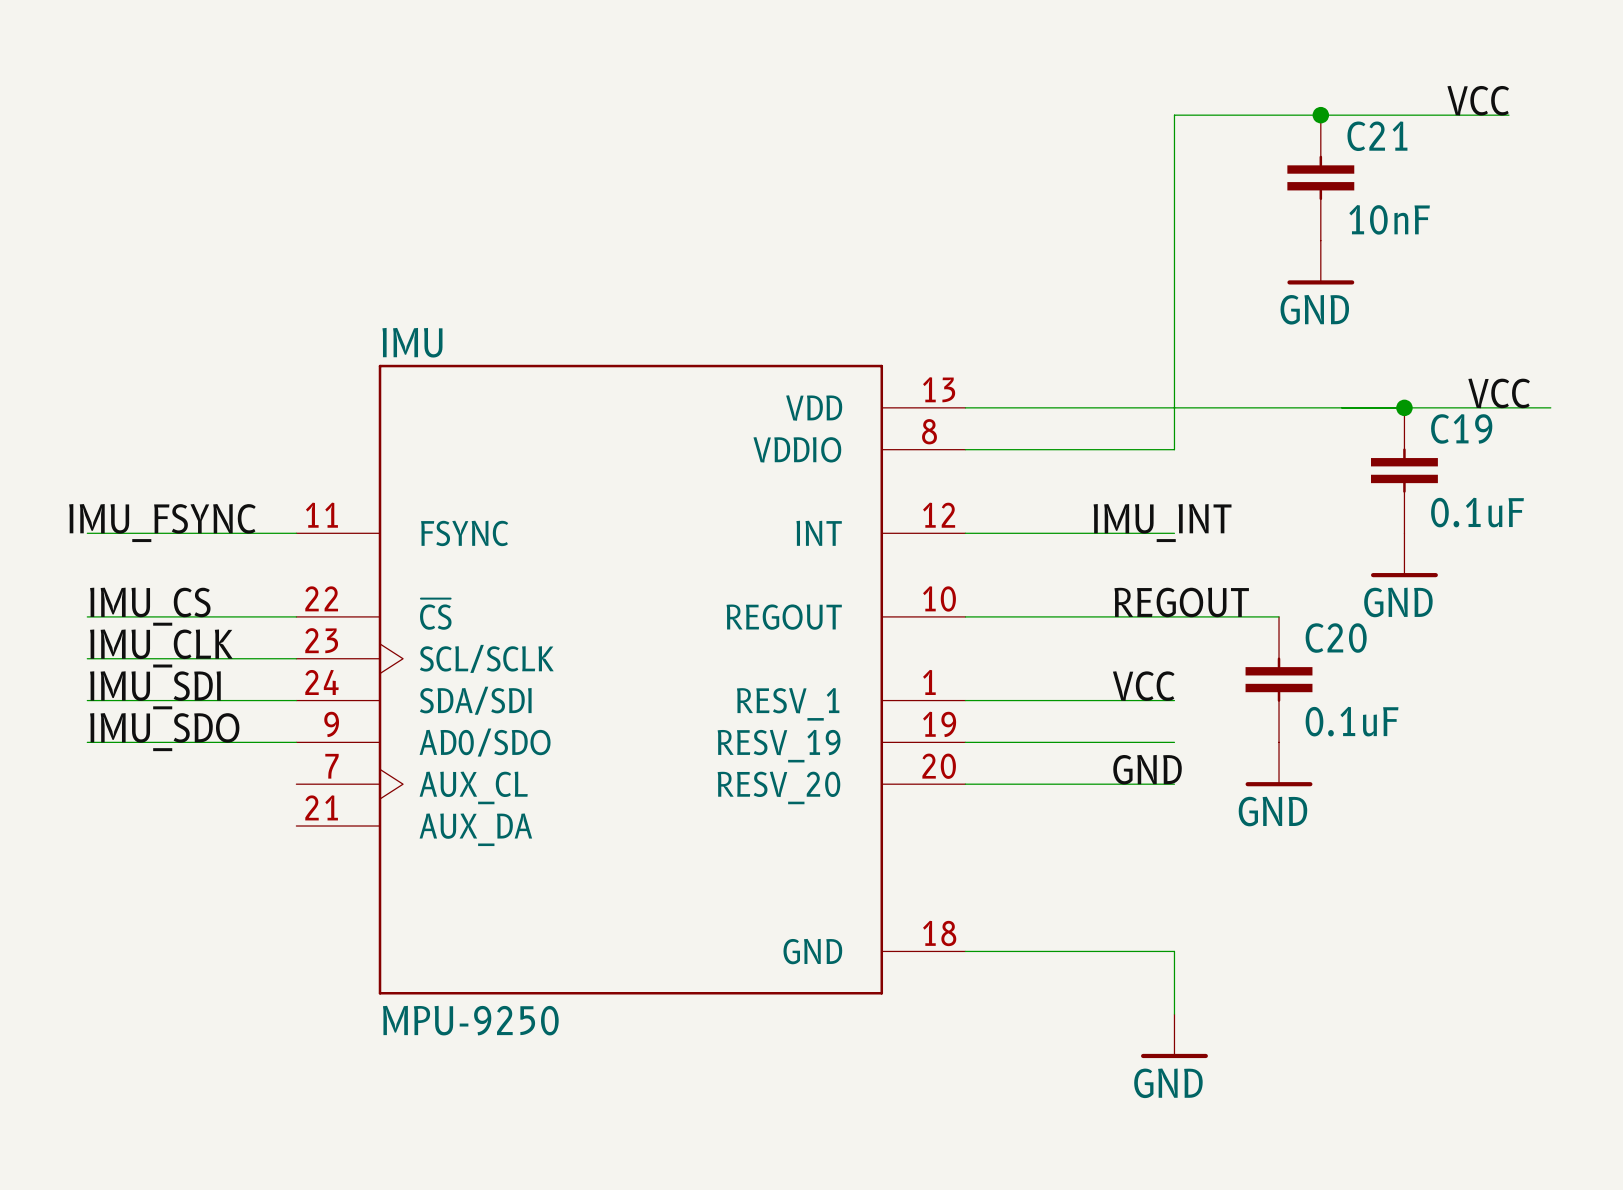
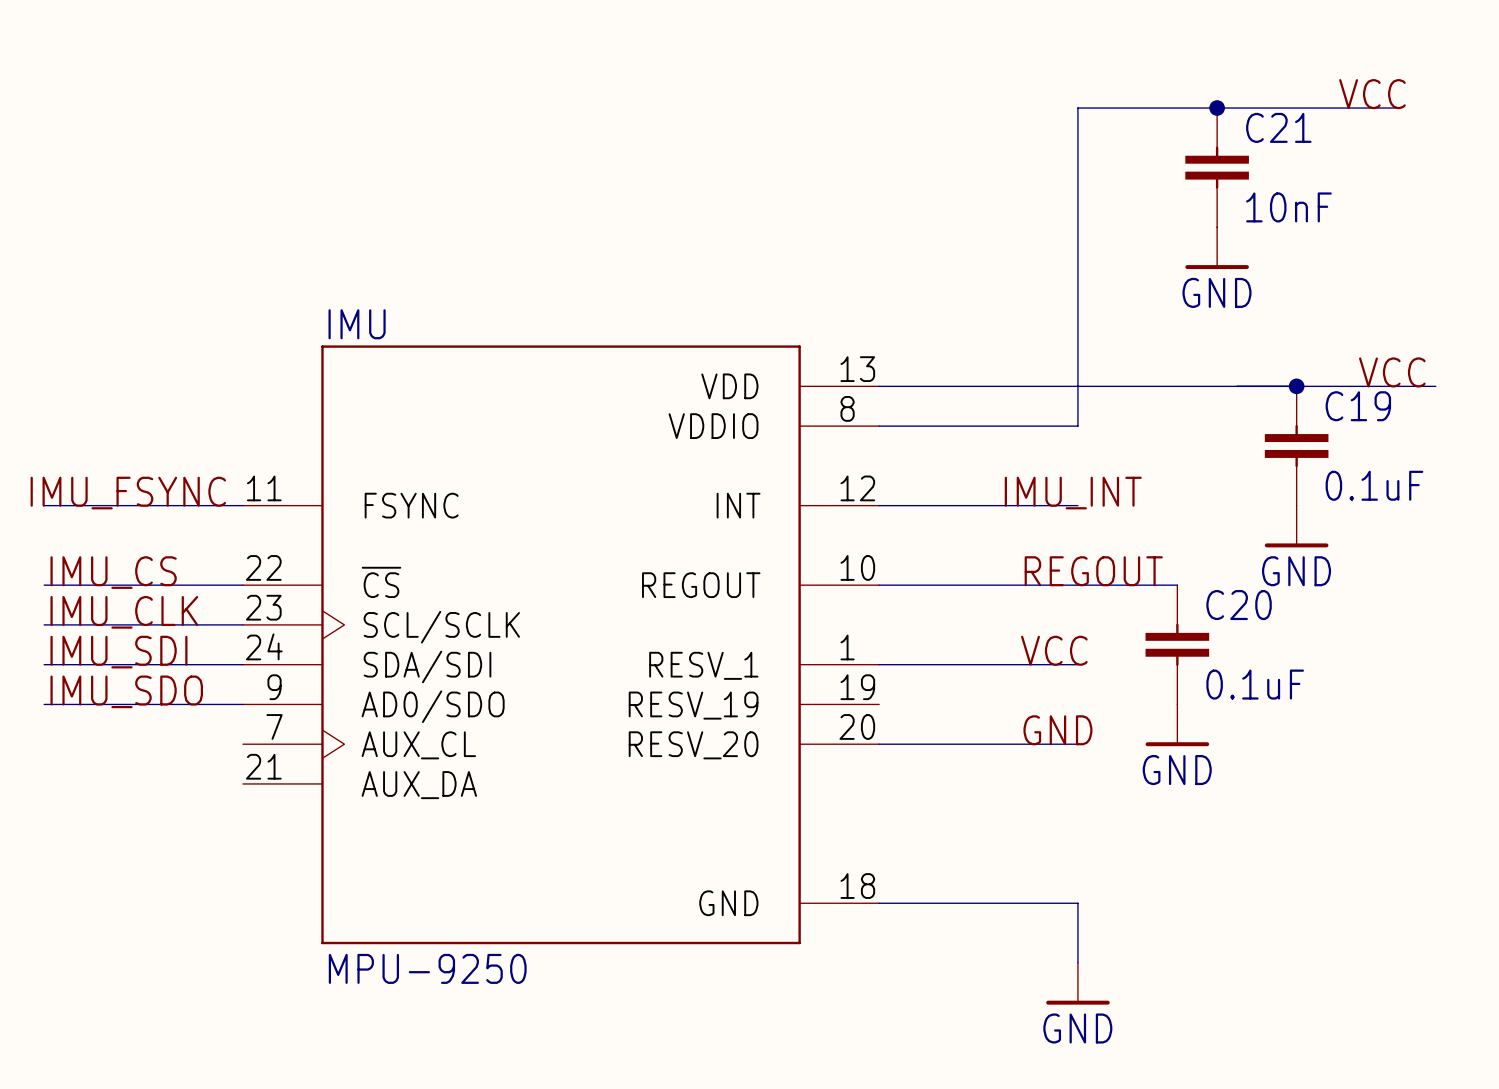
wire: (965, 742) (1174, 742) -> none

